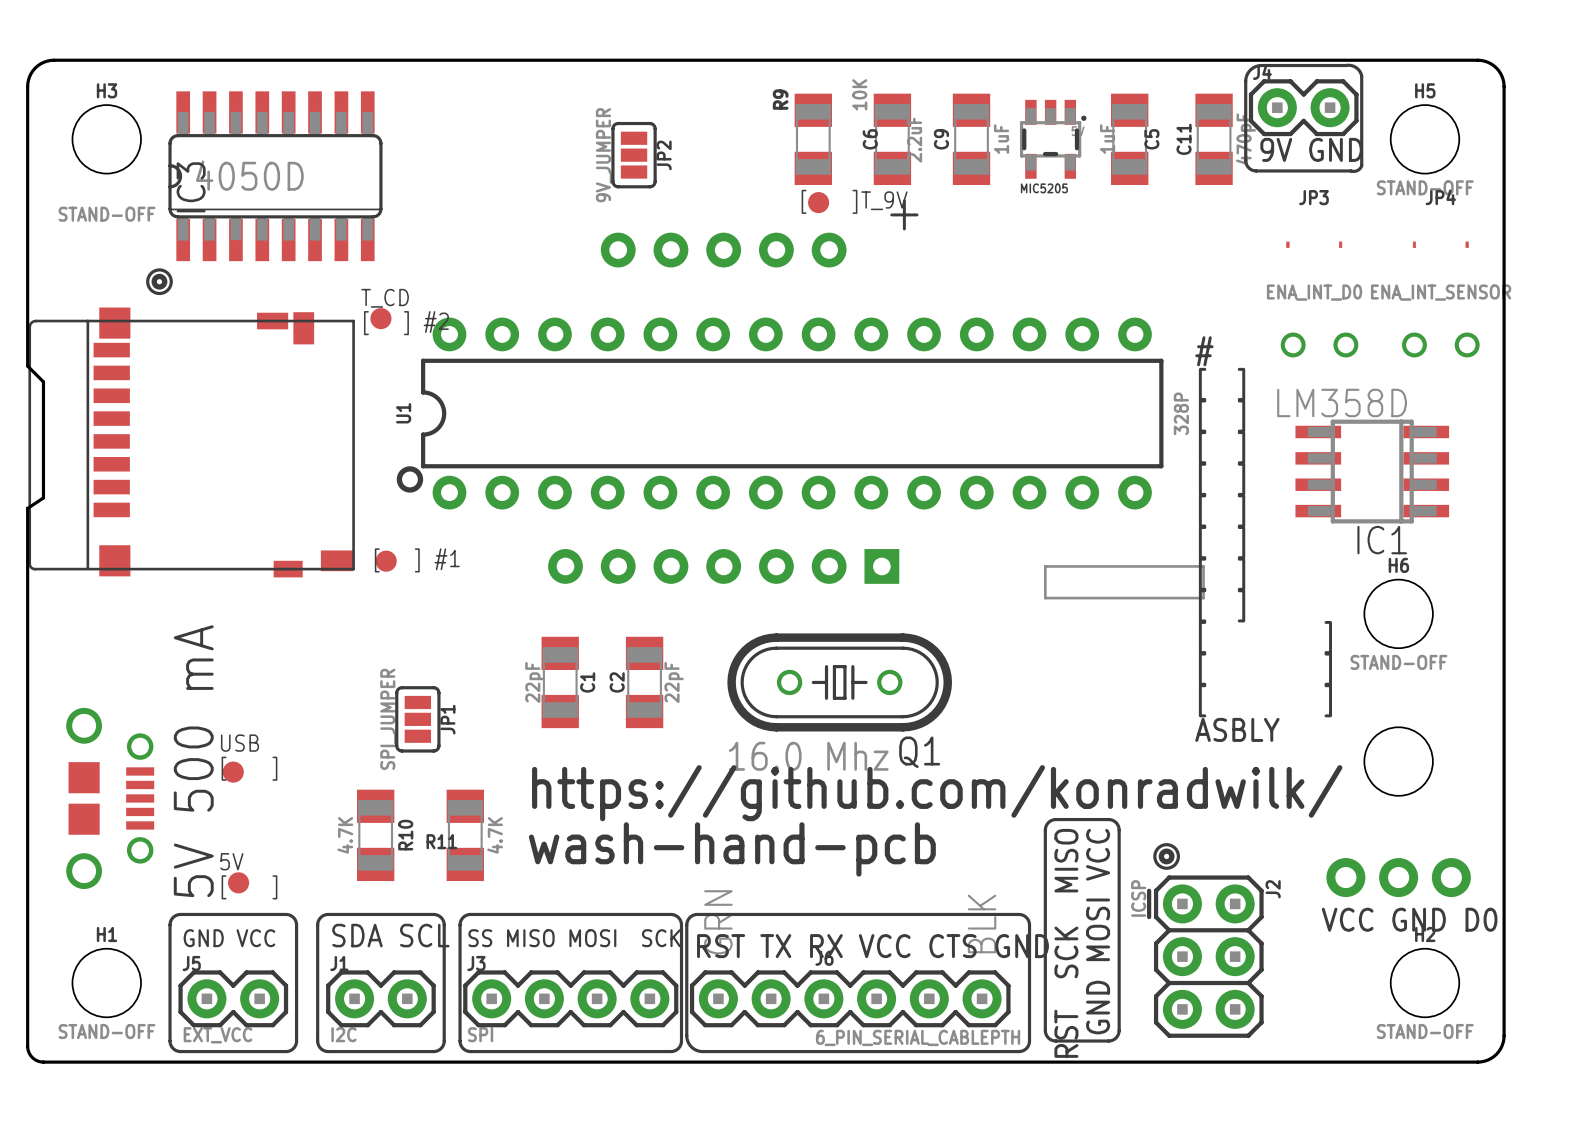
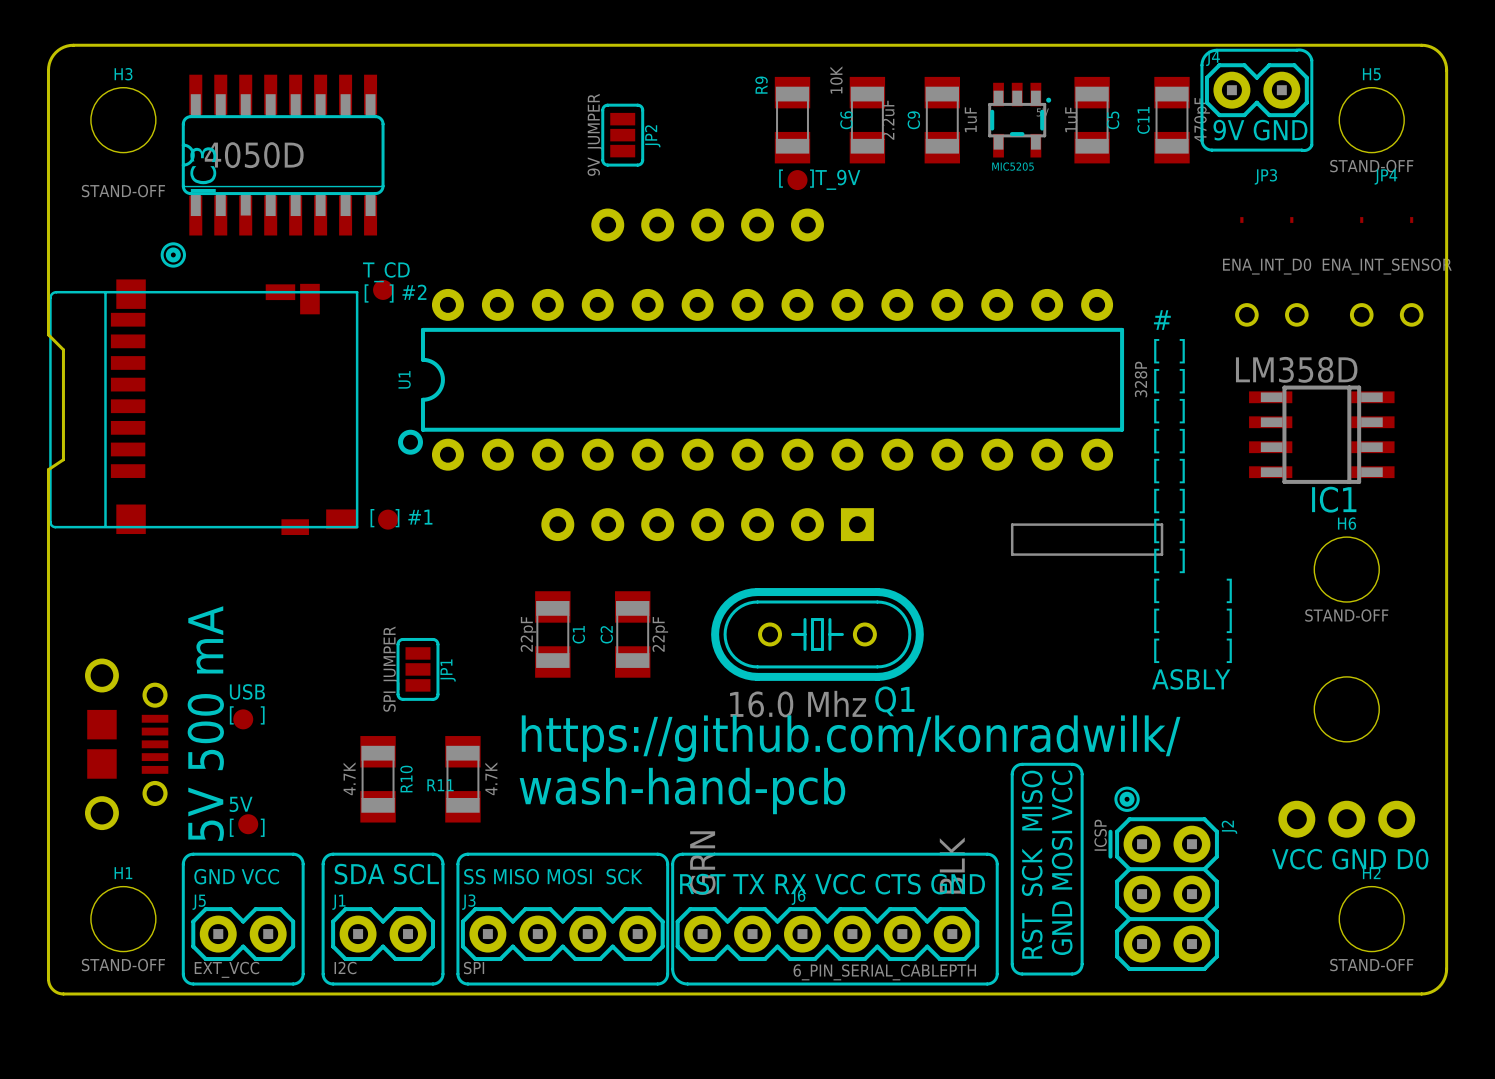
text: + (904, 214) -> none

